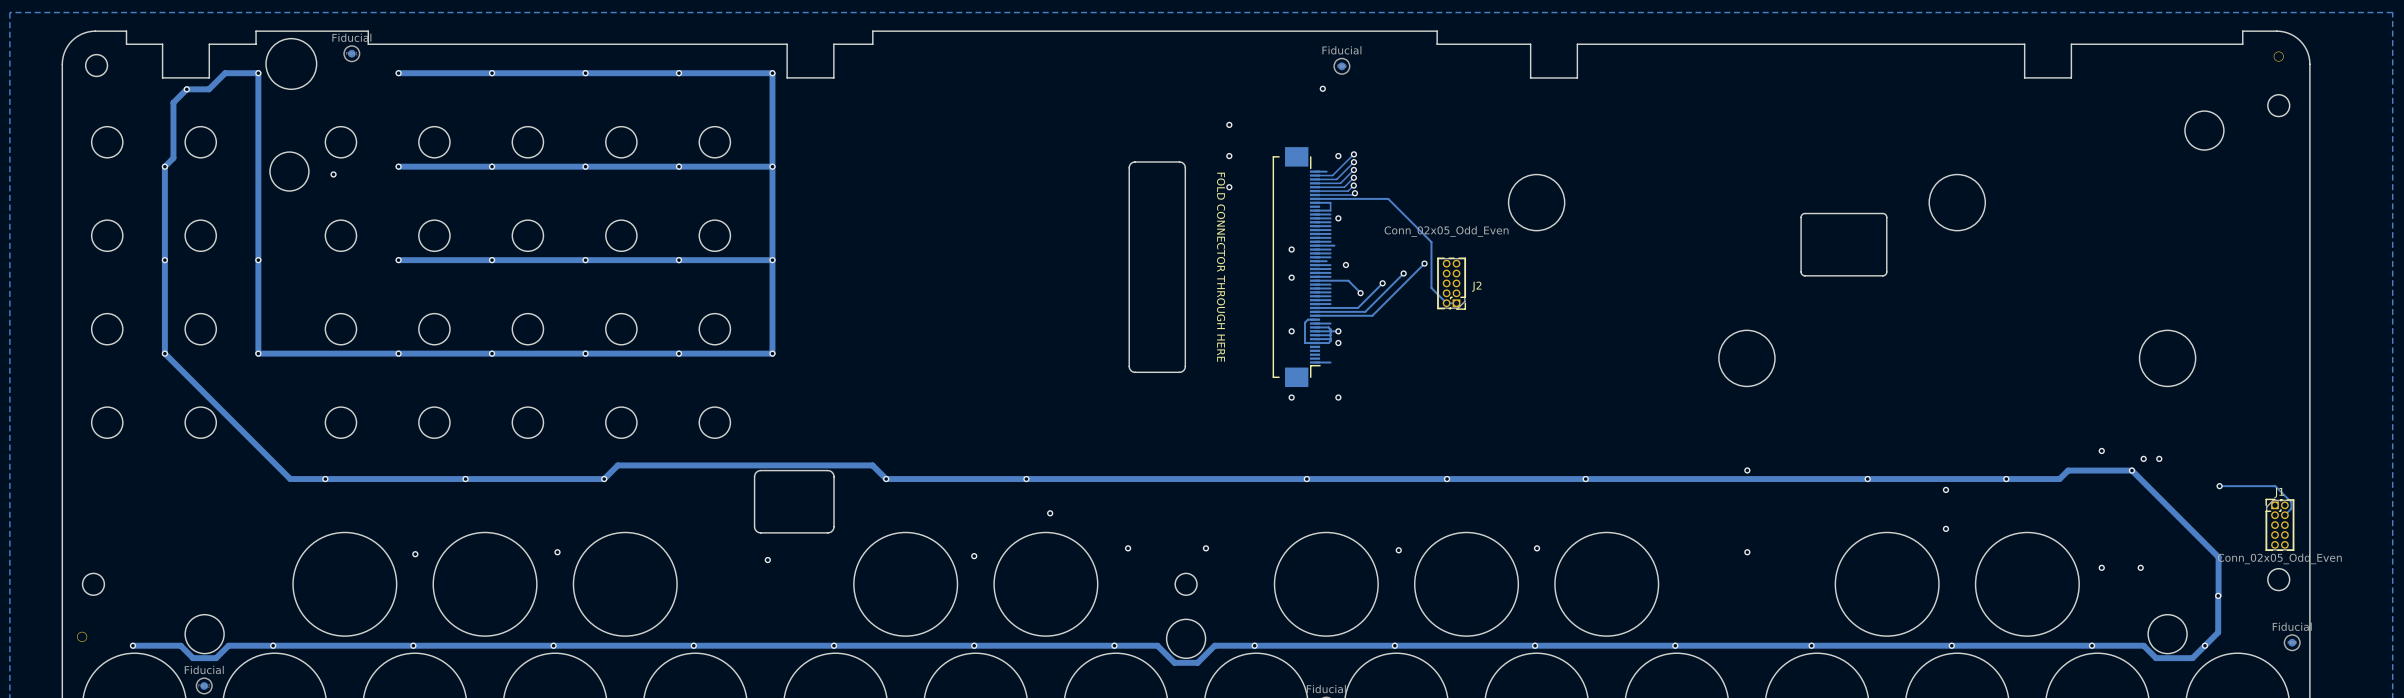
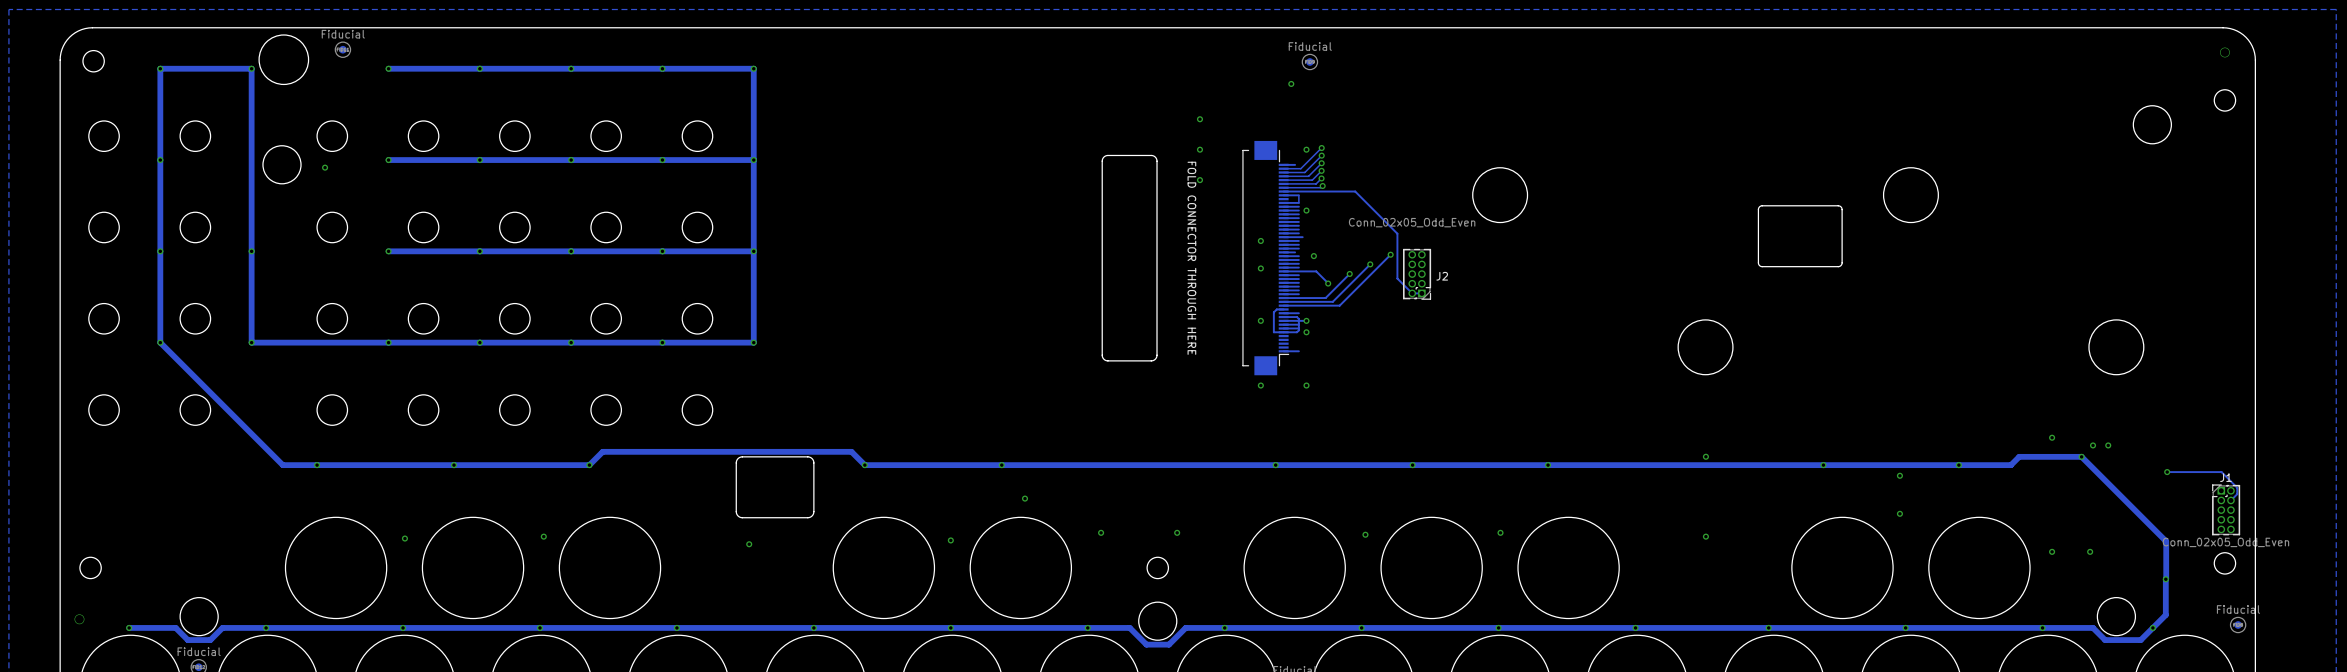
board edge: (2309, 64) (2308, 53) (2300, 40) (2287, 33) (2276, 31) (2242, 31) (2242, 44) (2071, 44) (2071, 77) (2024, 77) (2024, 44) (1577, 44) (1577, 77) (1530, 77) (1530, 44) (1437, 44) (1437, 31) (872, 31) (872, 44) (833, 44) (833, 77) (787, 77) (787, 44) (368, 44) (368, 31) (256, 31) (256, 44) (209, 44) (209, 77) (162, 77) (162, 44) (126, 44) (126, 31) (95, 31) (84, 33) (72, 40) (64, 53) (62, 64) -> (2255, 60) (2253, 49) (2245, 37) (2237, 30) (2223, 27) (92, 27) (81, 29) (69, 37) (61, 49) (60, 60)
track: (225, 73) (208, 89) (186, 89) (173, 102) (173, 158) (164, 166) -> (219, 68) (160, 68) (160, 160)
via position: (186, 89) -> (160, 68)

